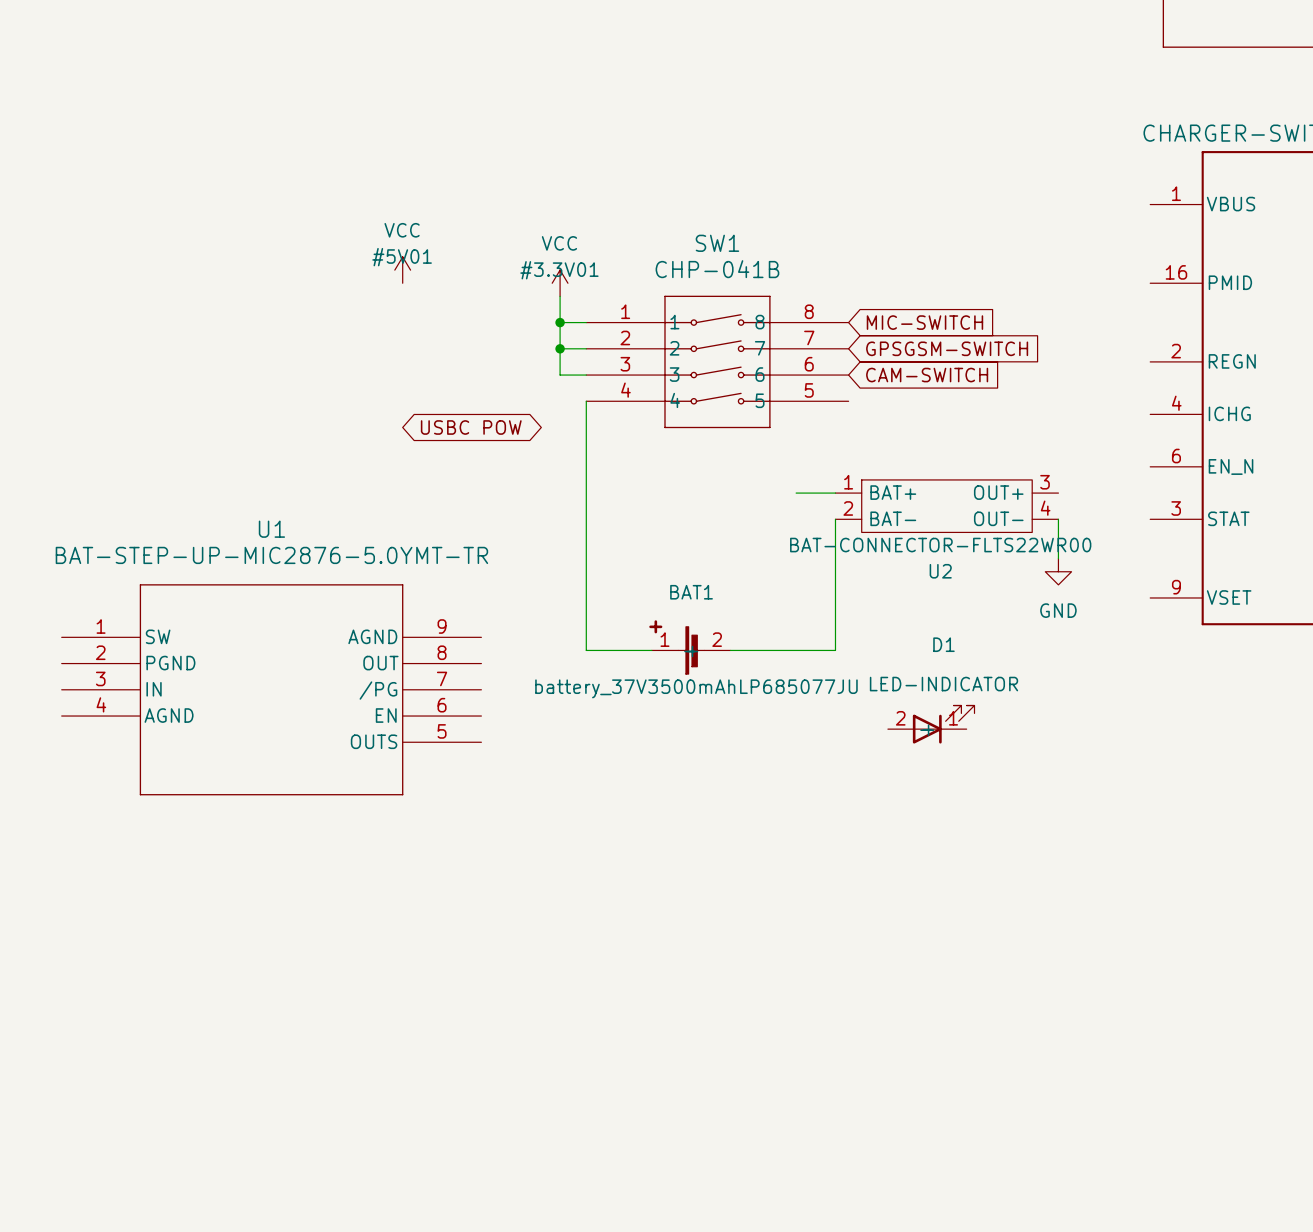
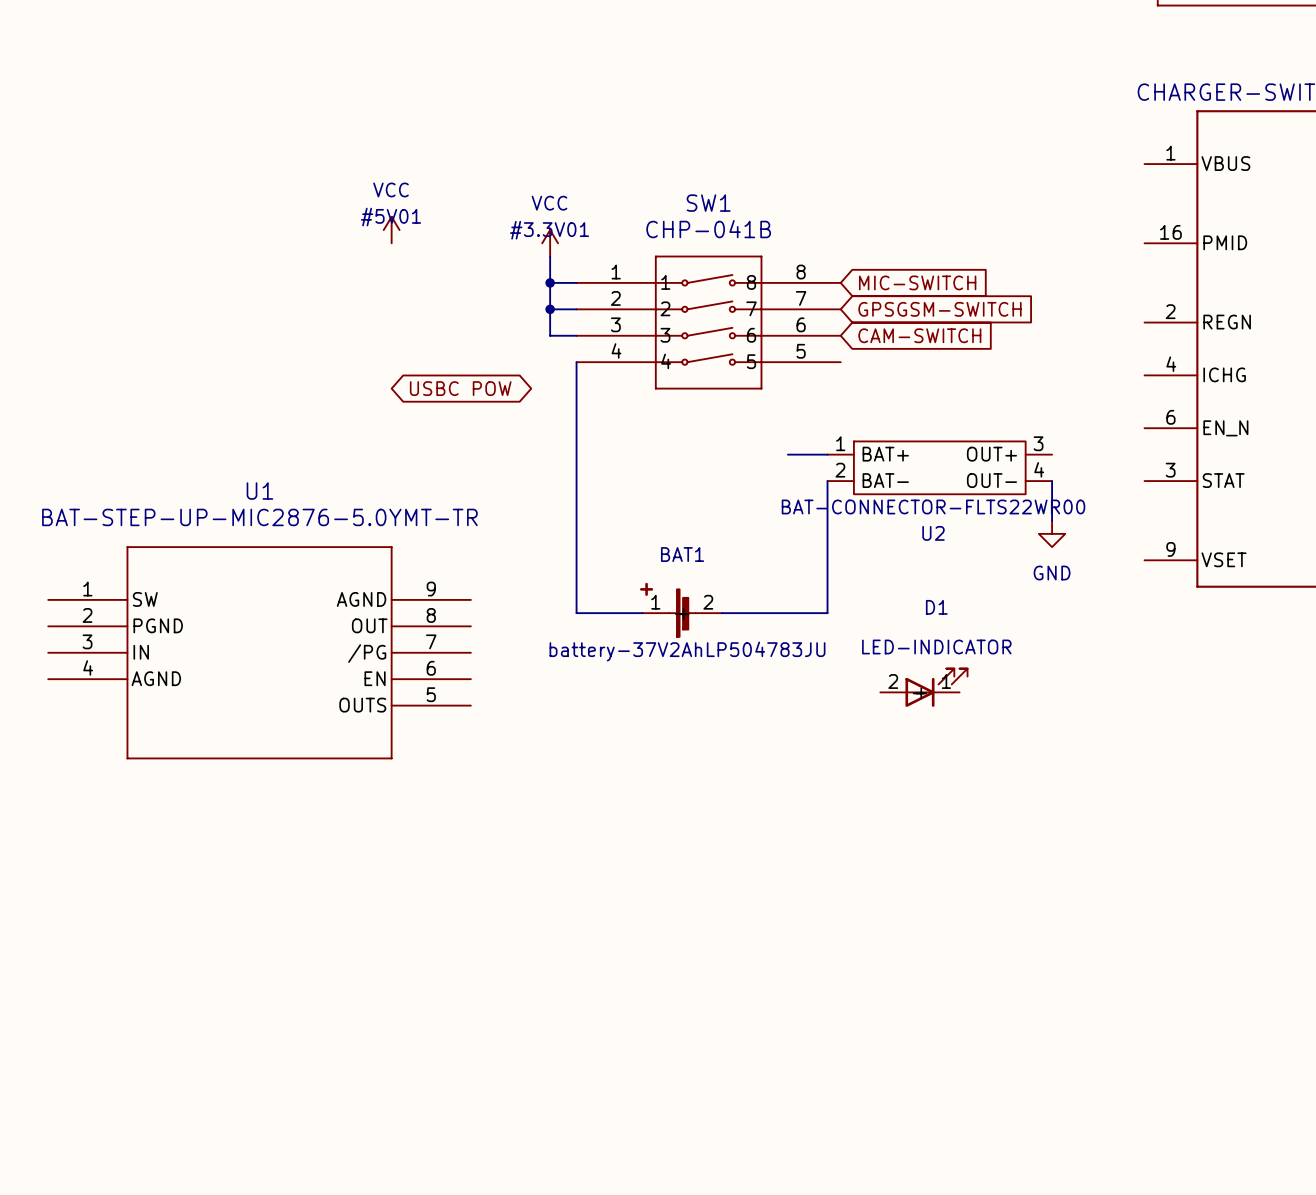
BAT1 value: battery_37V3500mAhLP685077JU (696, 688) -> battery-37V2AhLP504783JU (687, 651)

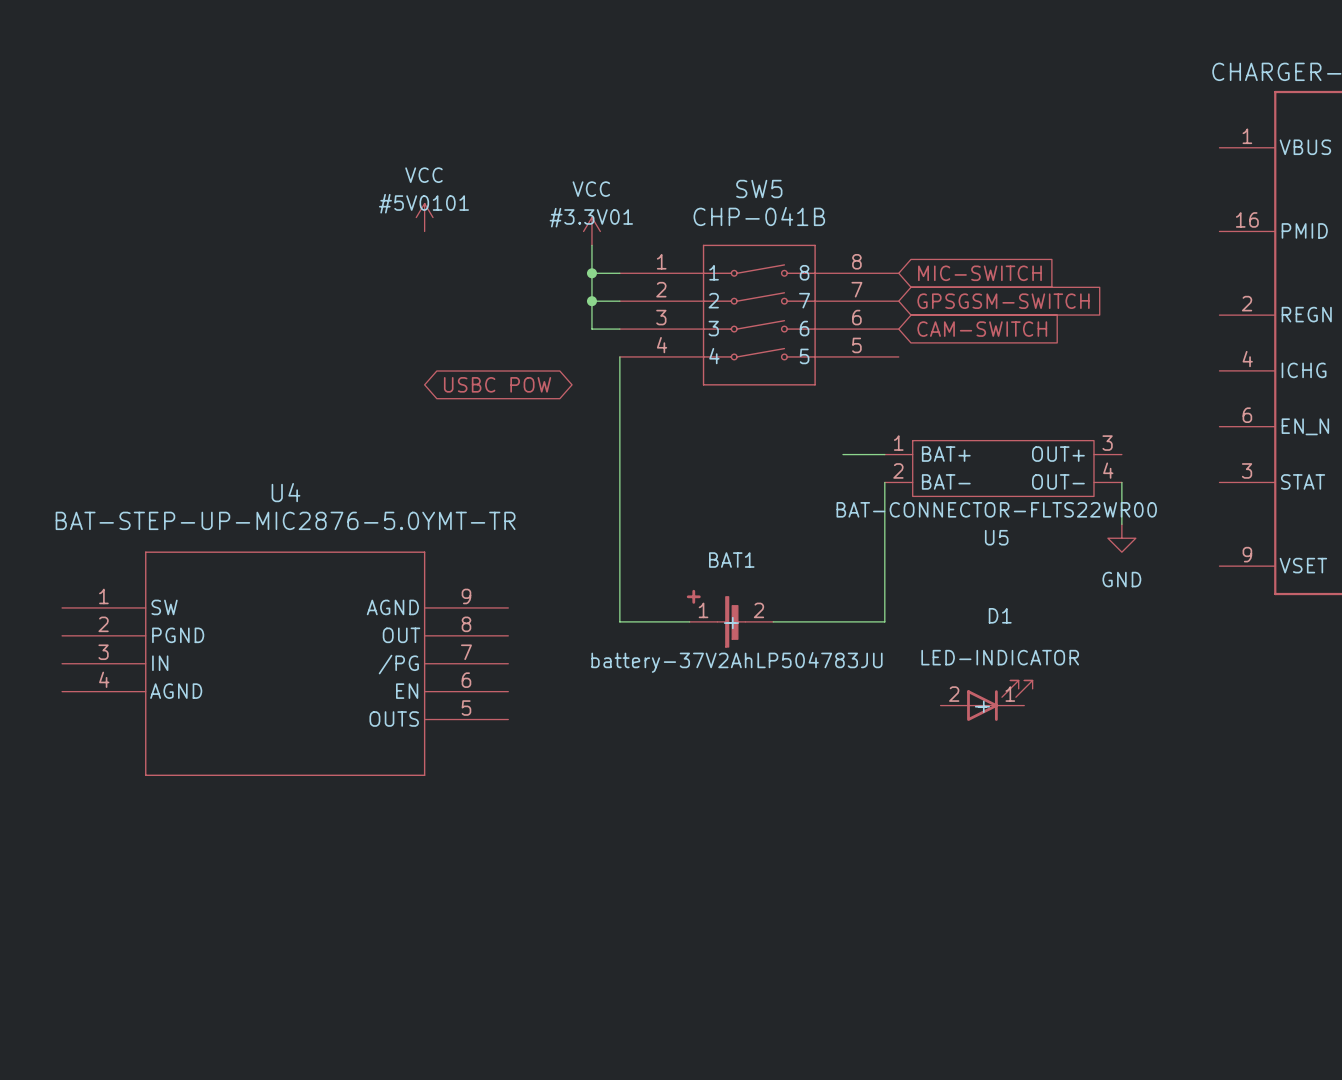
SW1 name: SW1 (708, 203) -> SW5 (759, 188)
#5V01 name: #5V01 (391, 217) -> #5V0101 (423, 203)
U1 name: U1 (259, 491) -> U4 (285, 492)
U2 name: U2 (933, 533) -> U5 (996, 537)

